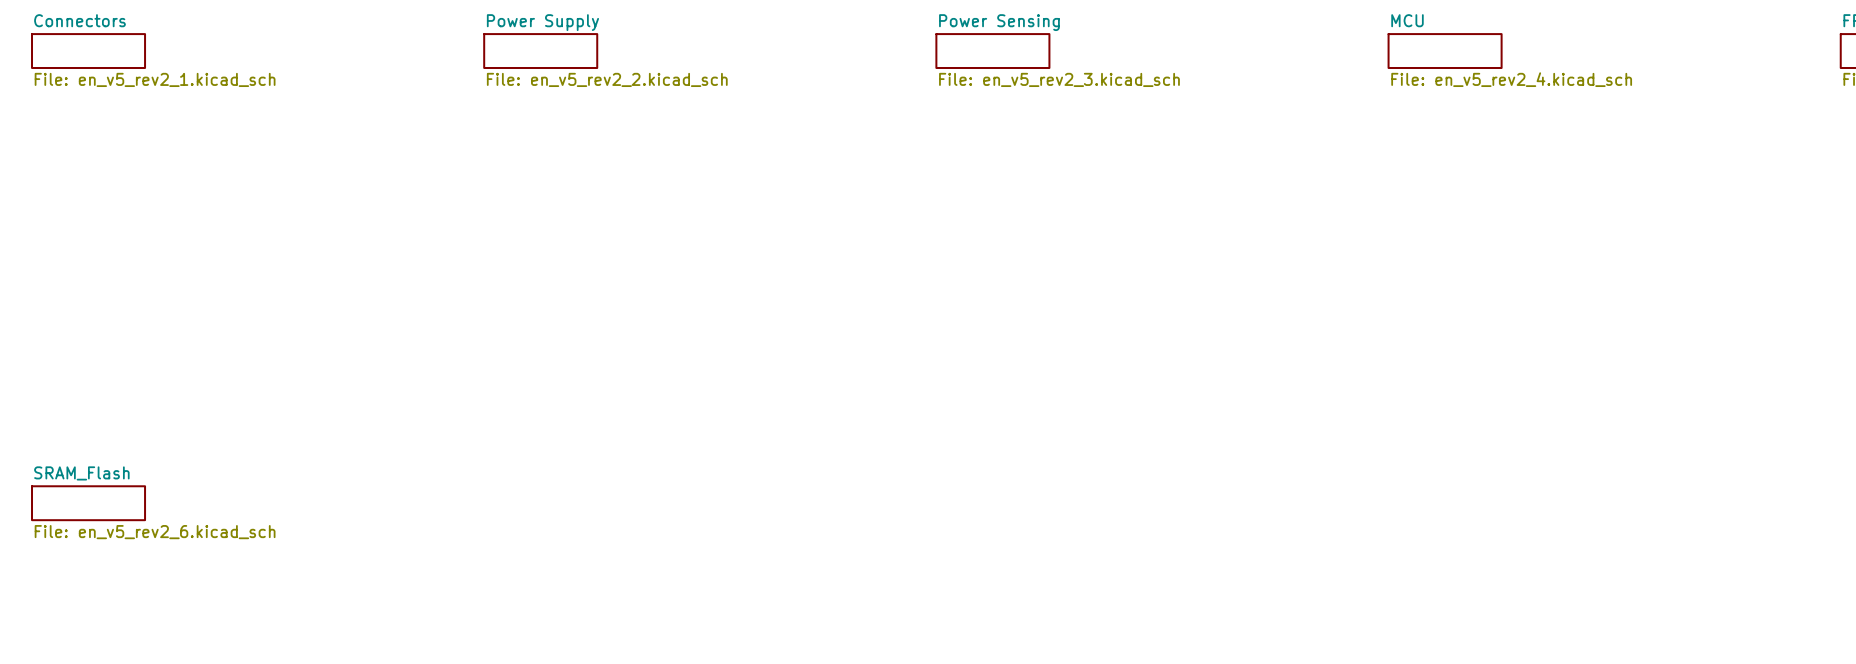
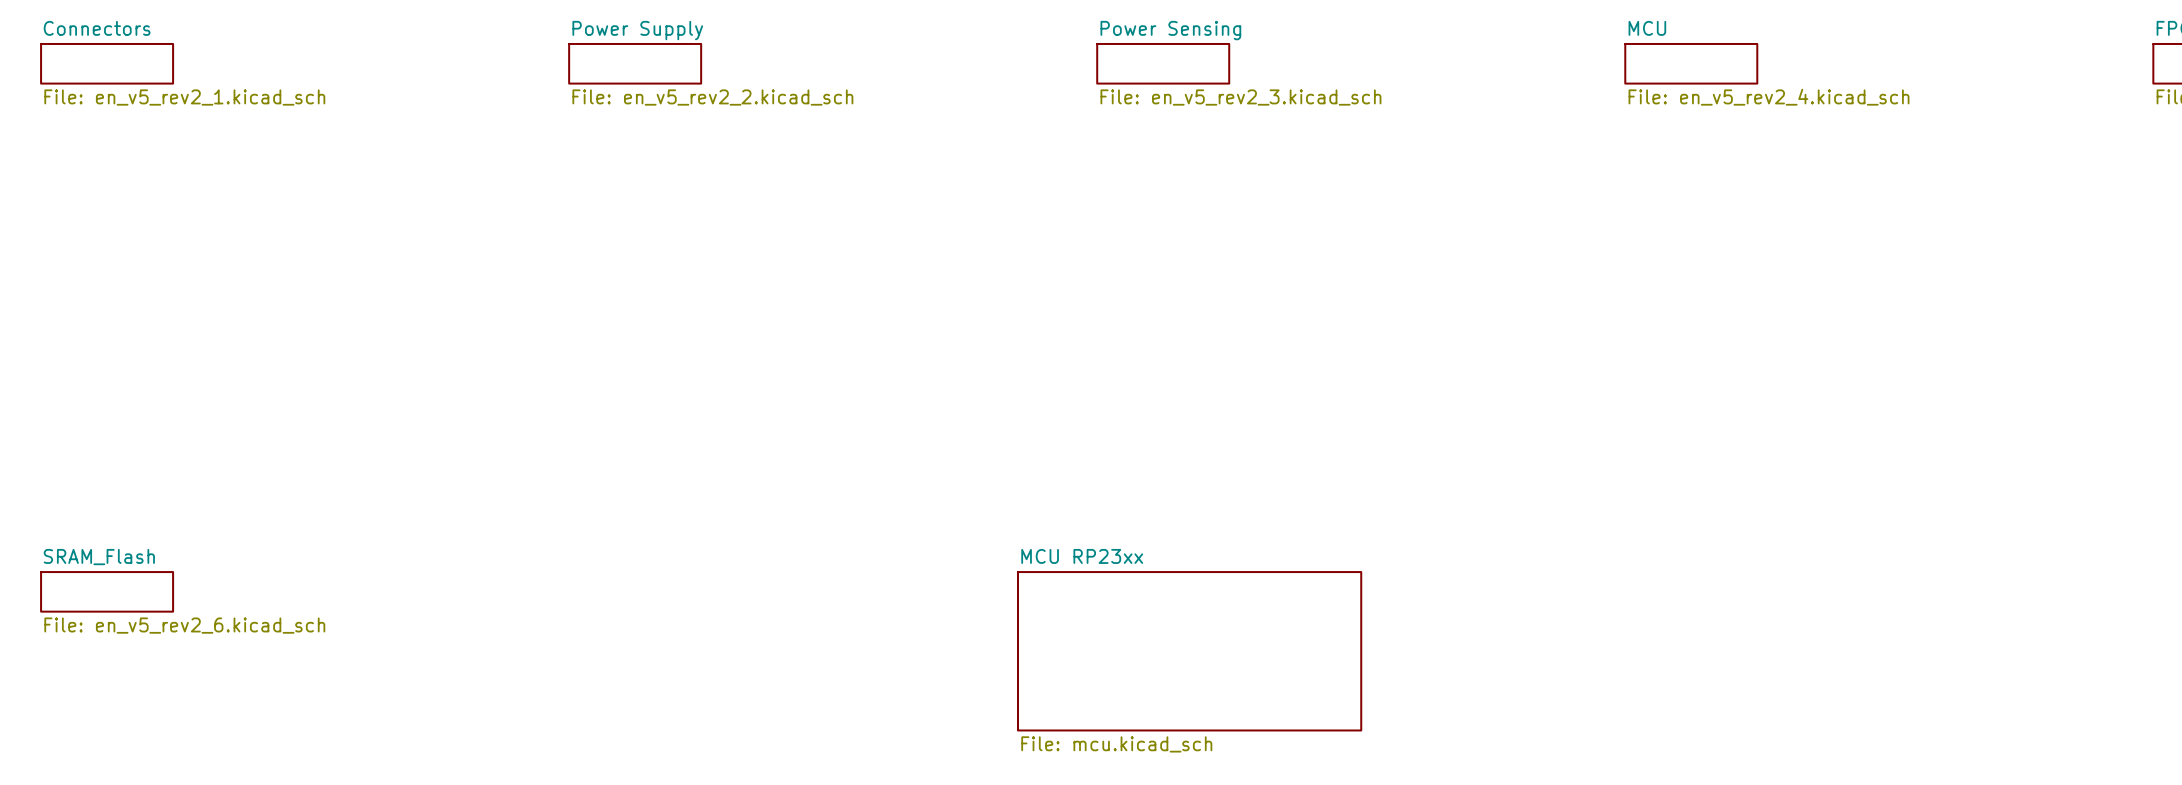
sheet MCU RP23xx: none -> File: mcu.kicad_sch (1189, 651)

